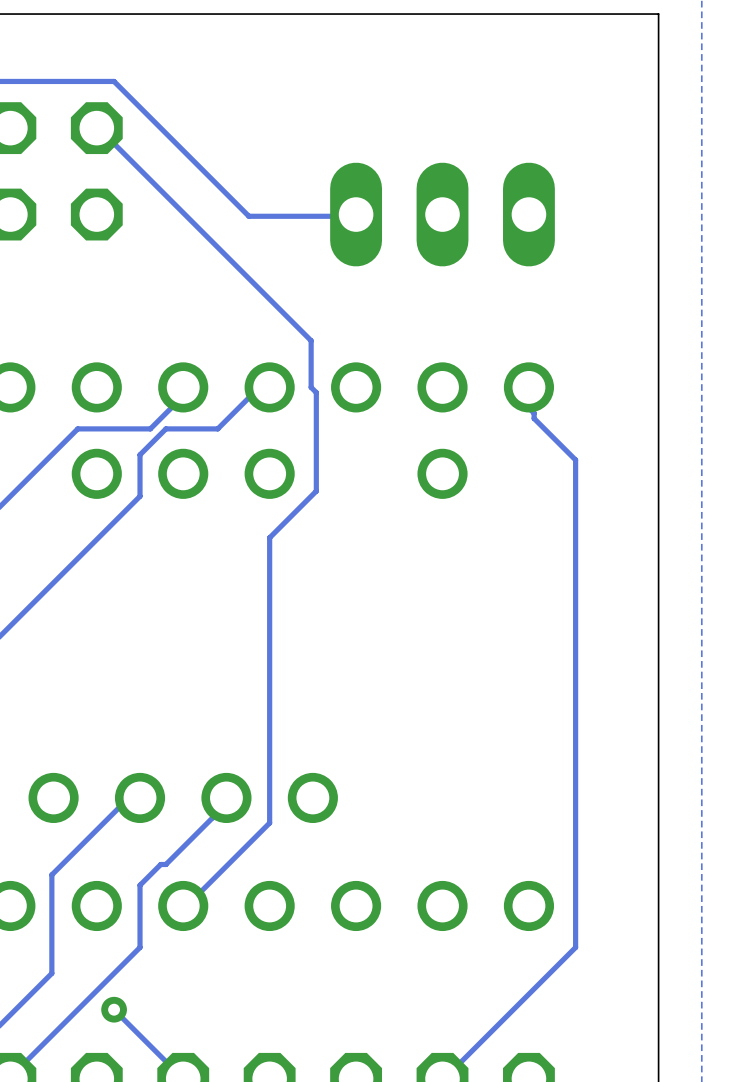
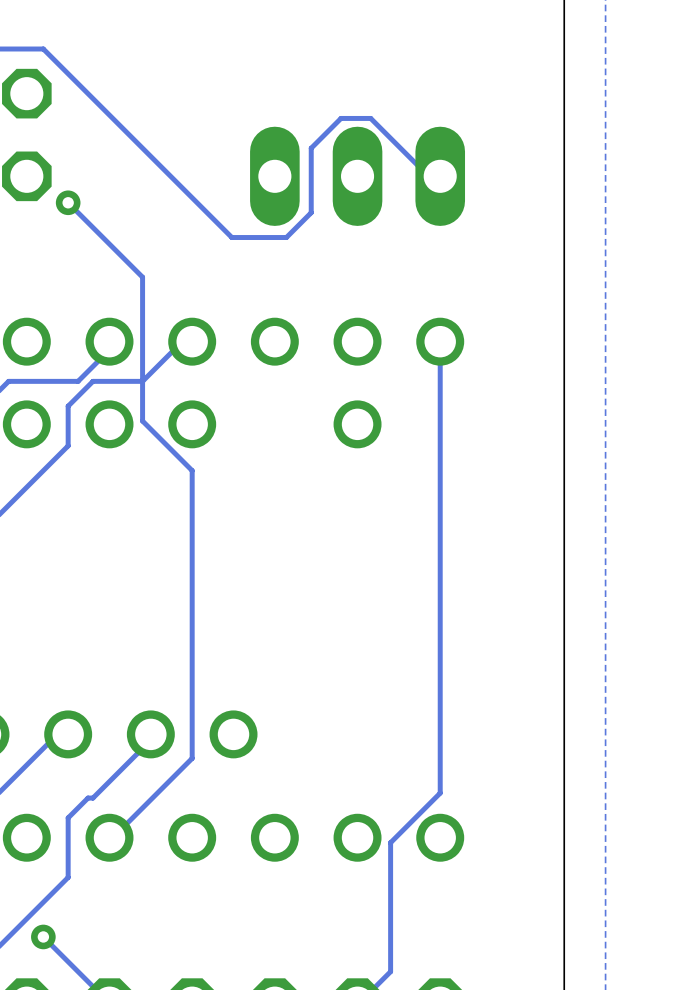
track: (96, 128) (311, 340) (311, 387) (316, 392) (316, 491) (269, 537) -> (68, 202) (142, 277) (142, 421) (192, 470) (192, 485)
track: (356, 214) (352, 216) (248, 216) -> (440, 176) (440, 173) (425, 173) (370, 118) (341, 118) (311, 148) (311, 212) (286, 237) (231, 237) (172, 177)
via: none -> (68, 202)
track: (528, 408) (534, 413) (534, 418) (575, 460) (575, 947) (477, 1046) -> (440, 361) (440, 793) (390, 842) (390, 971)

